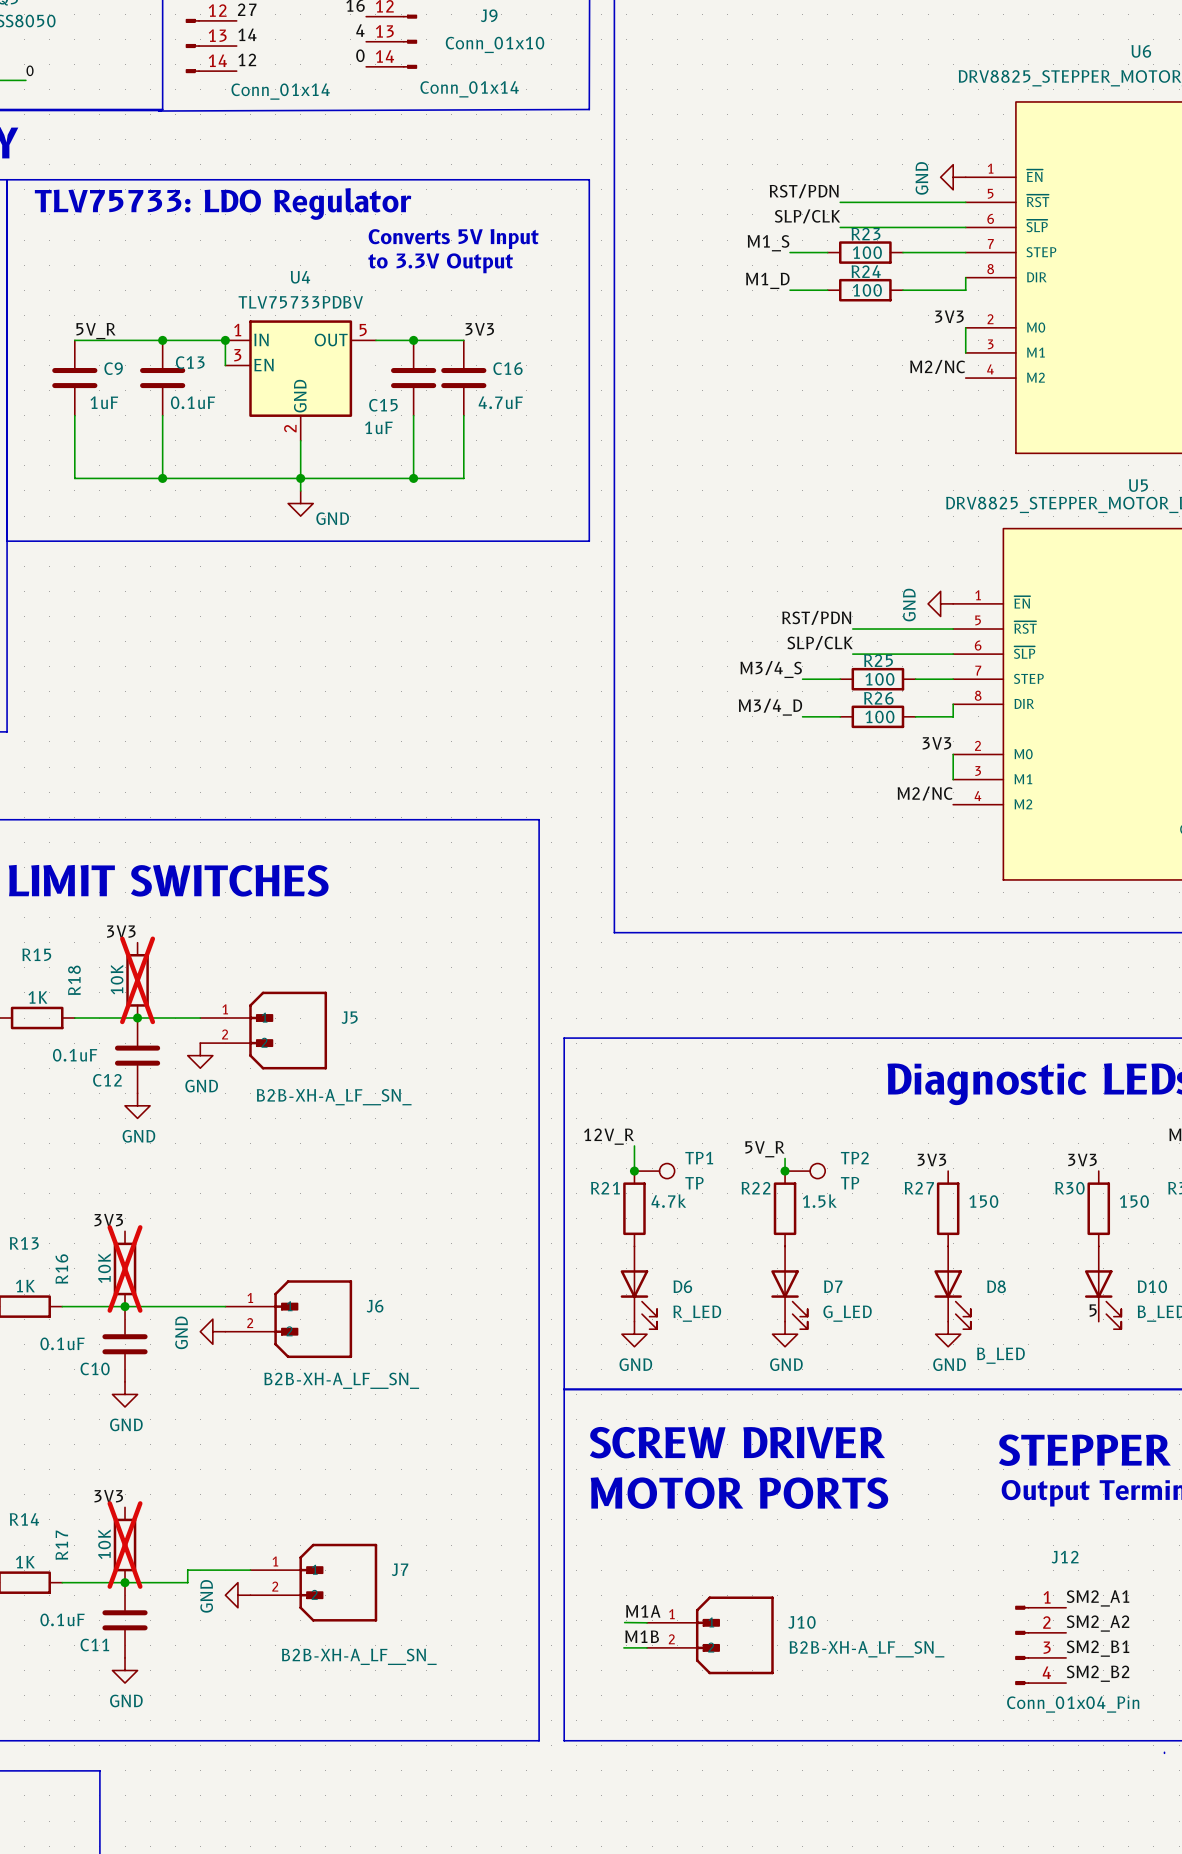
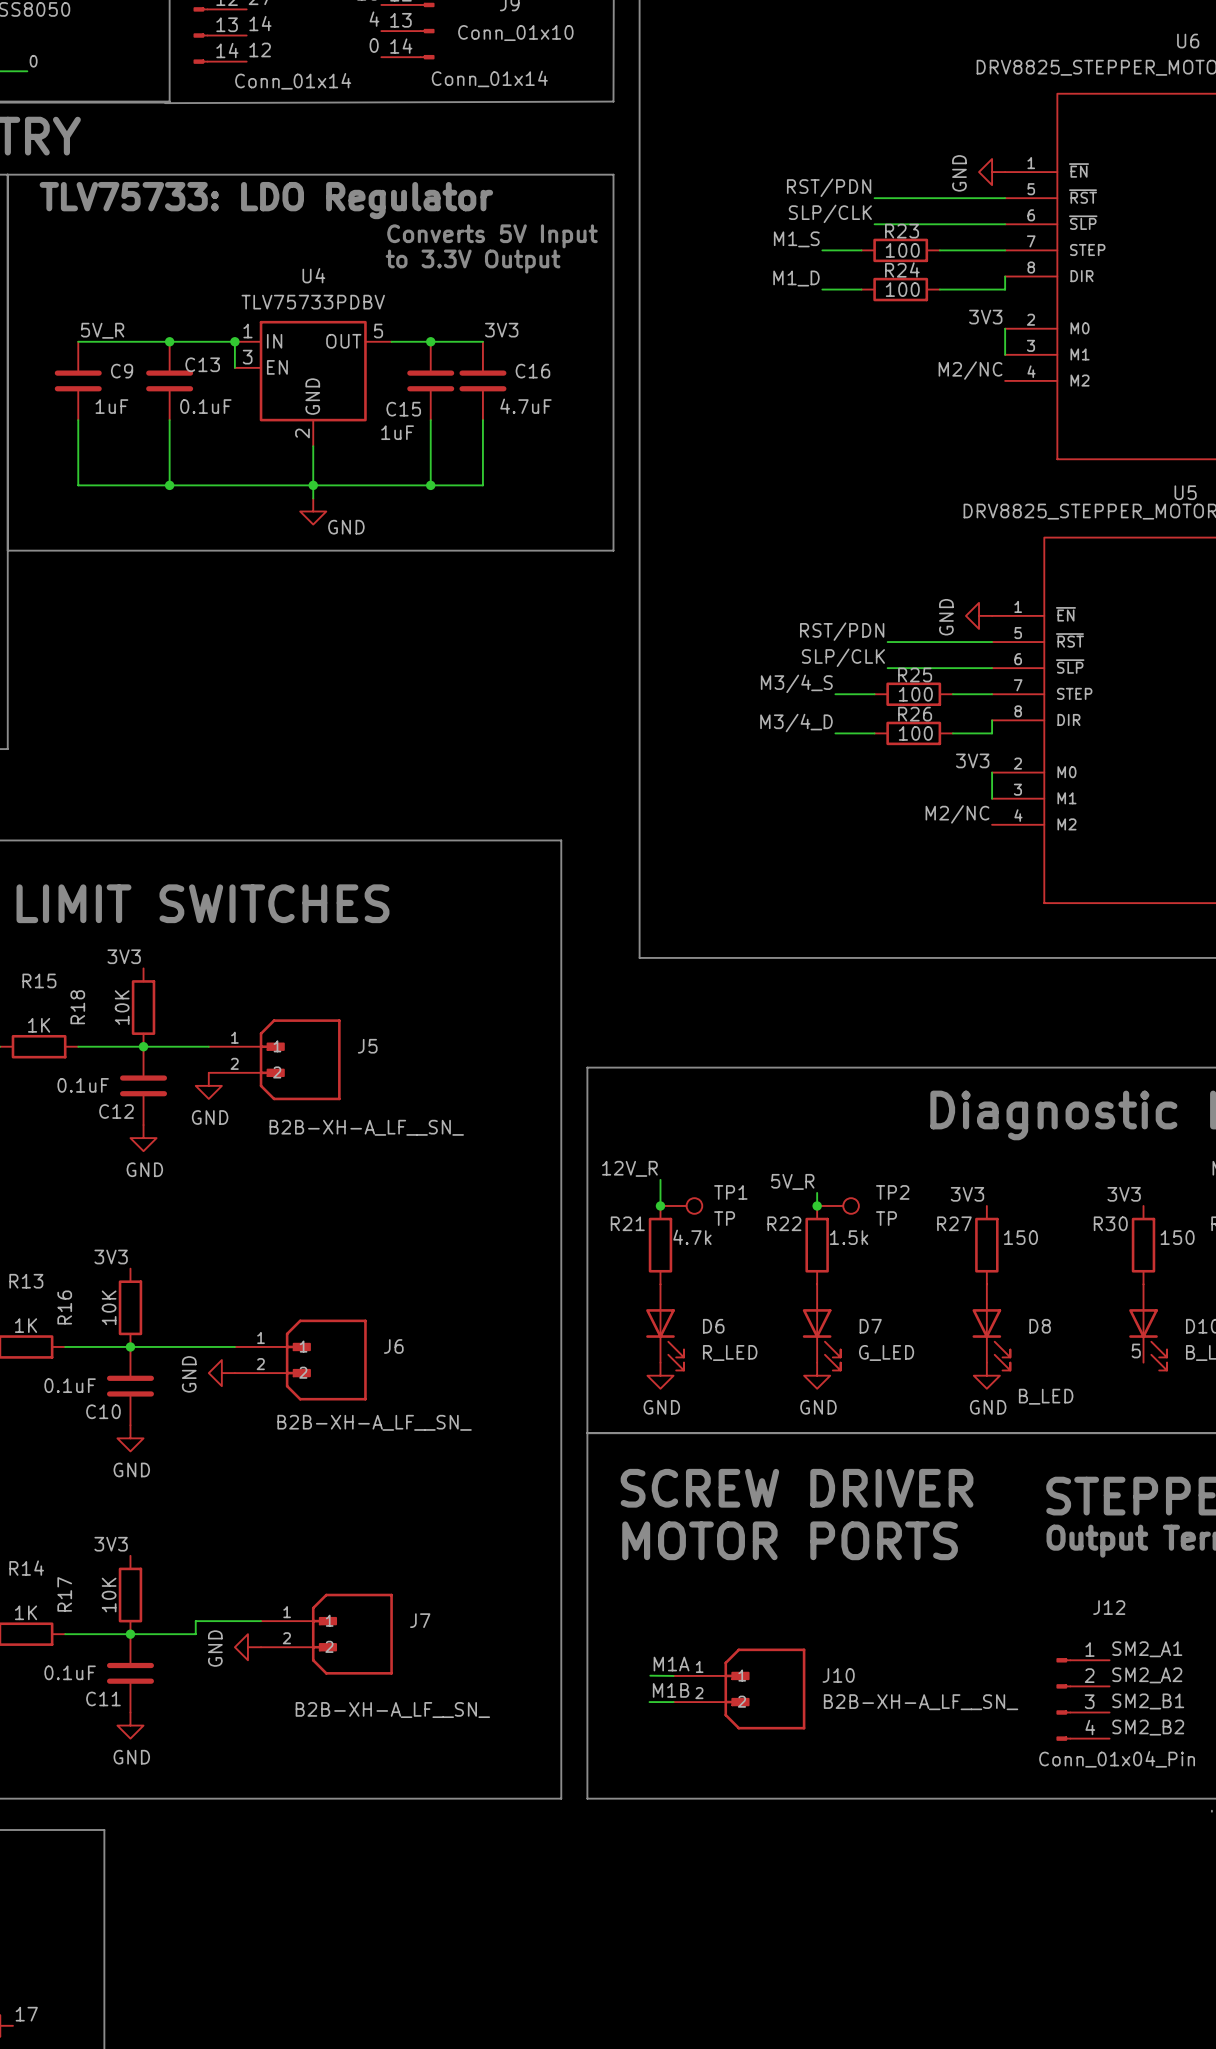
R18 do-not-place cross: (137, 980) -> none
R16 do-not-place cross: (125, 1268) -> none
R17 do-not-place cross: (125, 1545) -> none

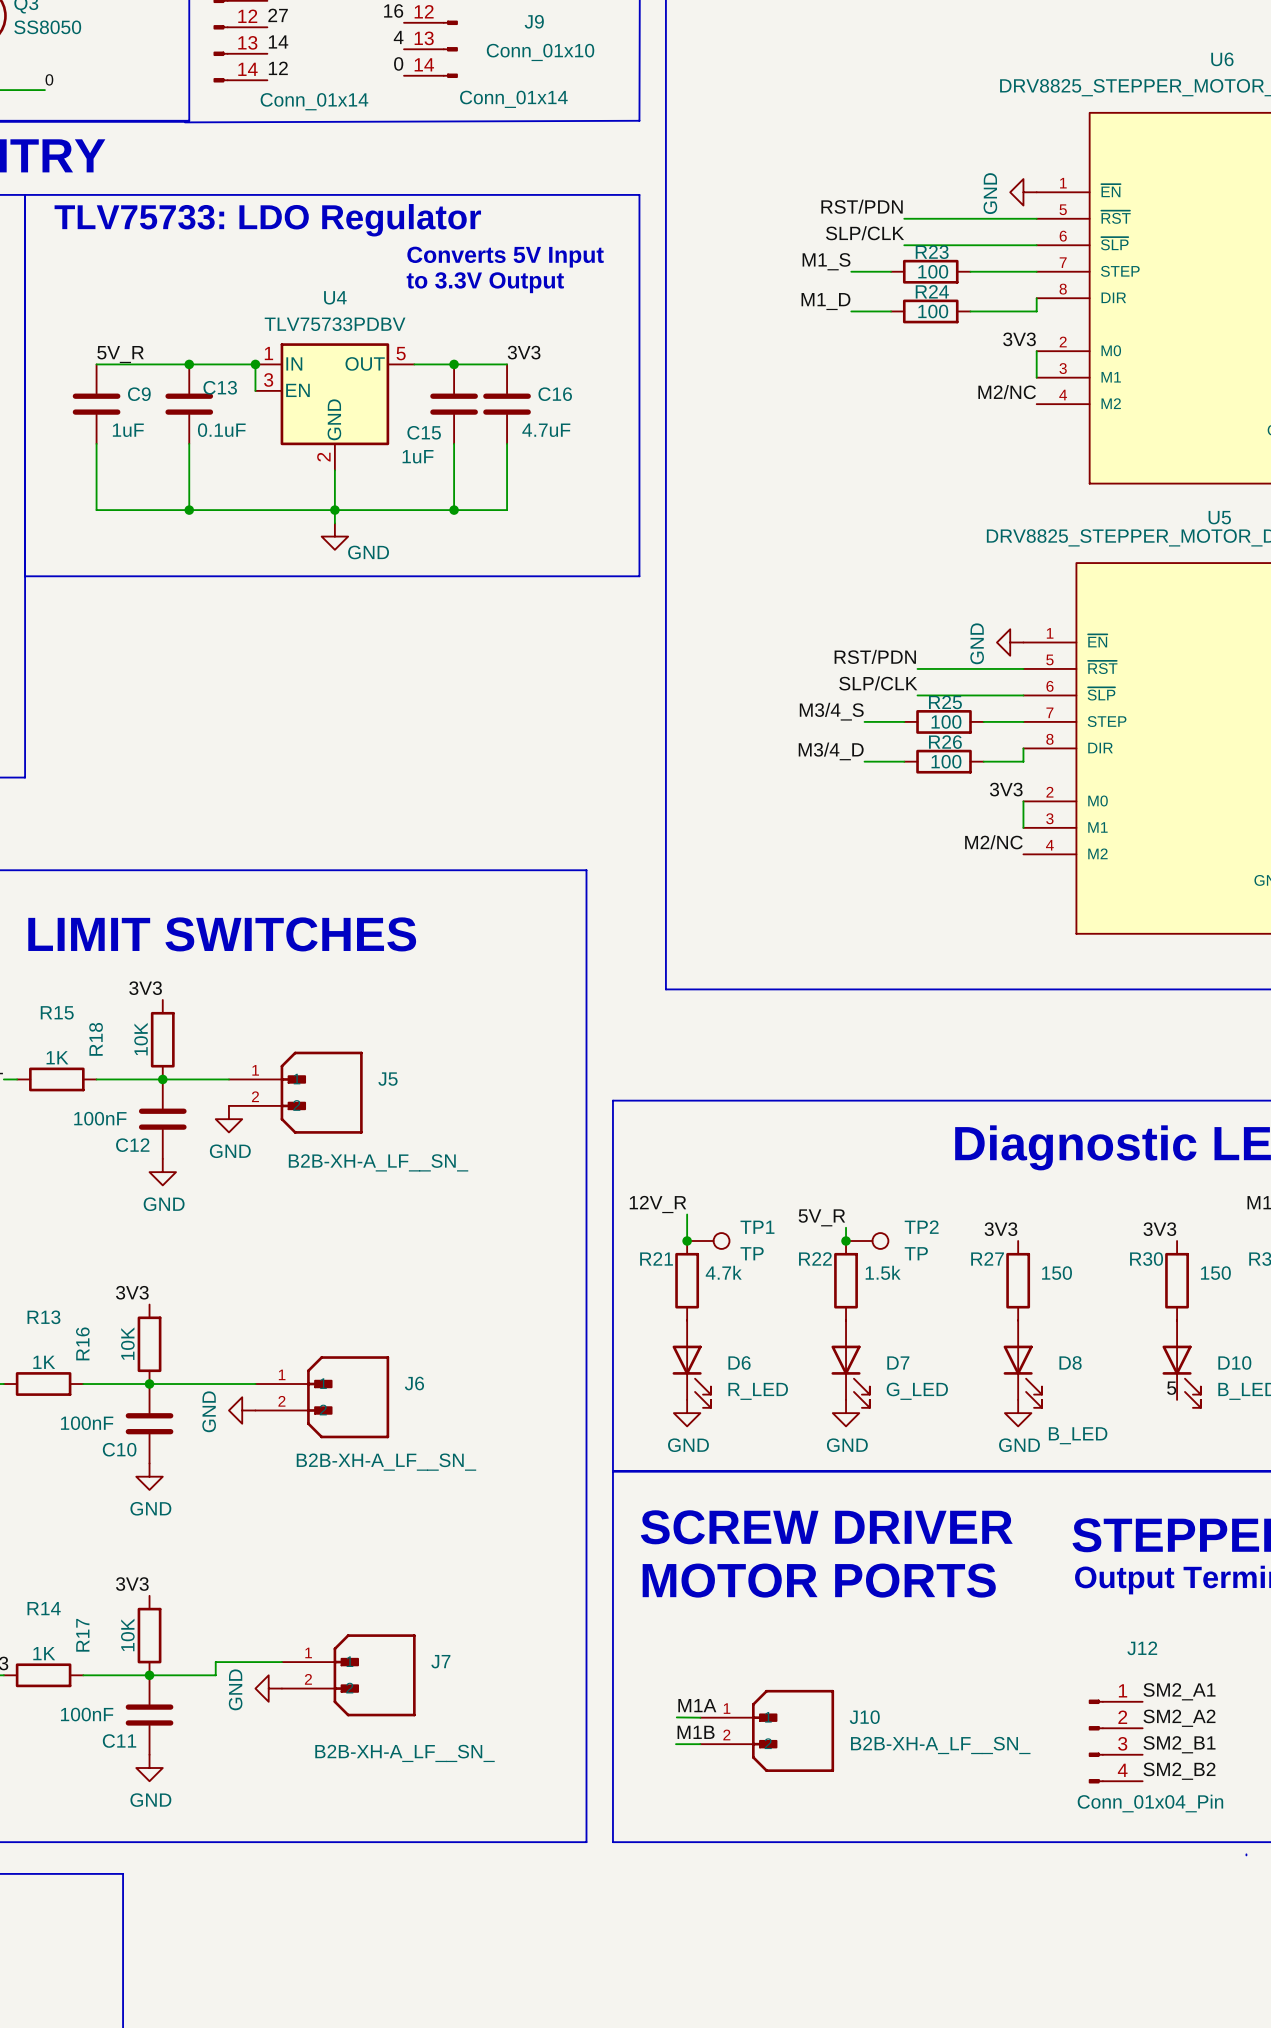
C12 value: 0.1uF (83, 1085) -> 100nF (100, 1118)
C10 value: 0.1uF (70, 1385) -> 100nF (87, 1423)
C11 value: 0.1uF (70, 1672) -> 100nF (87, 1714)

